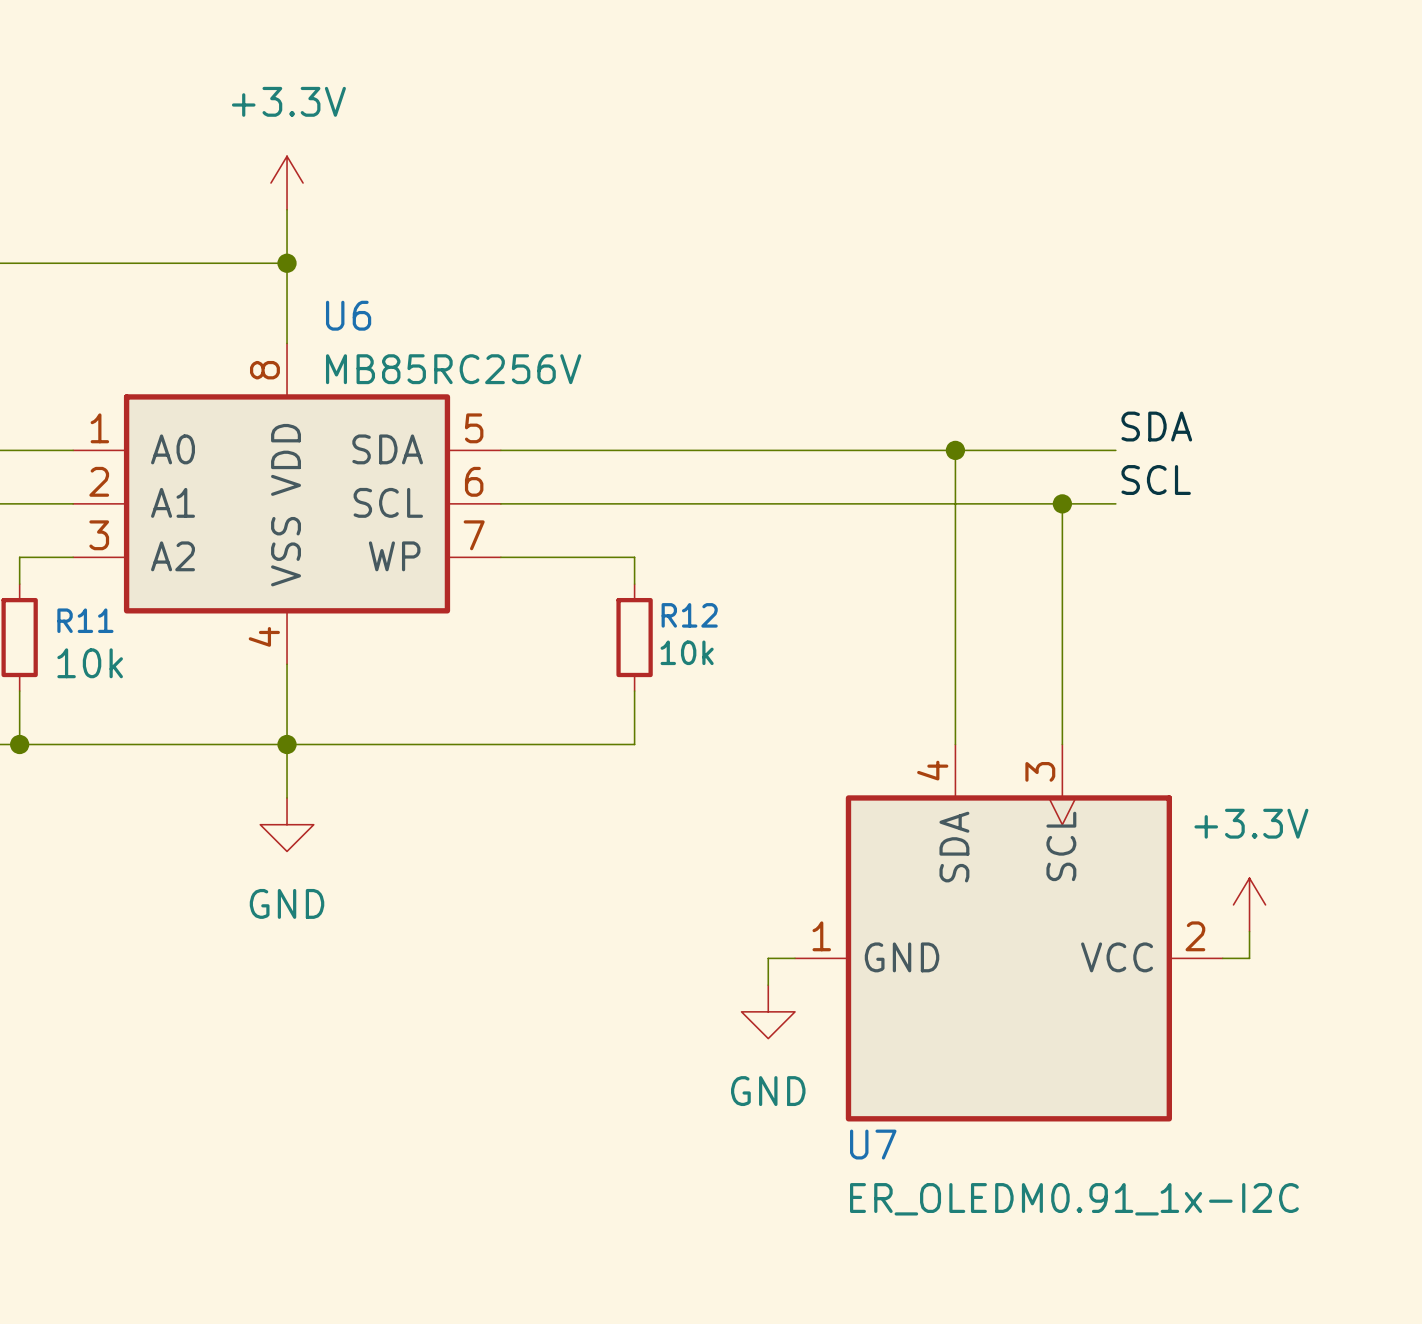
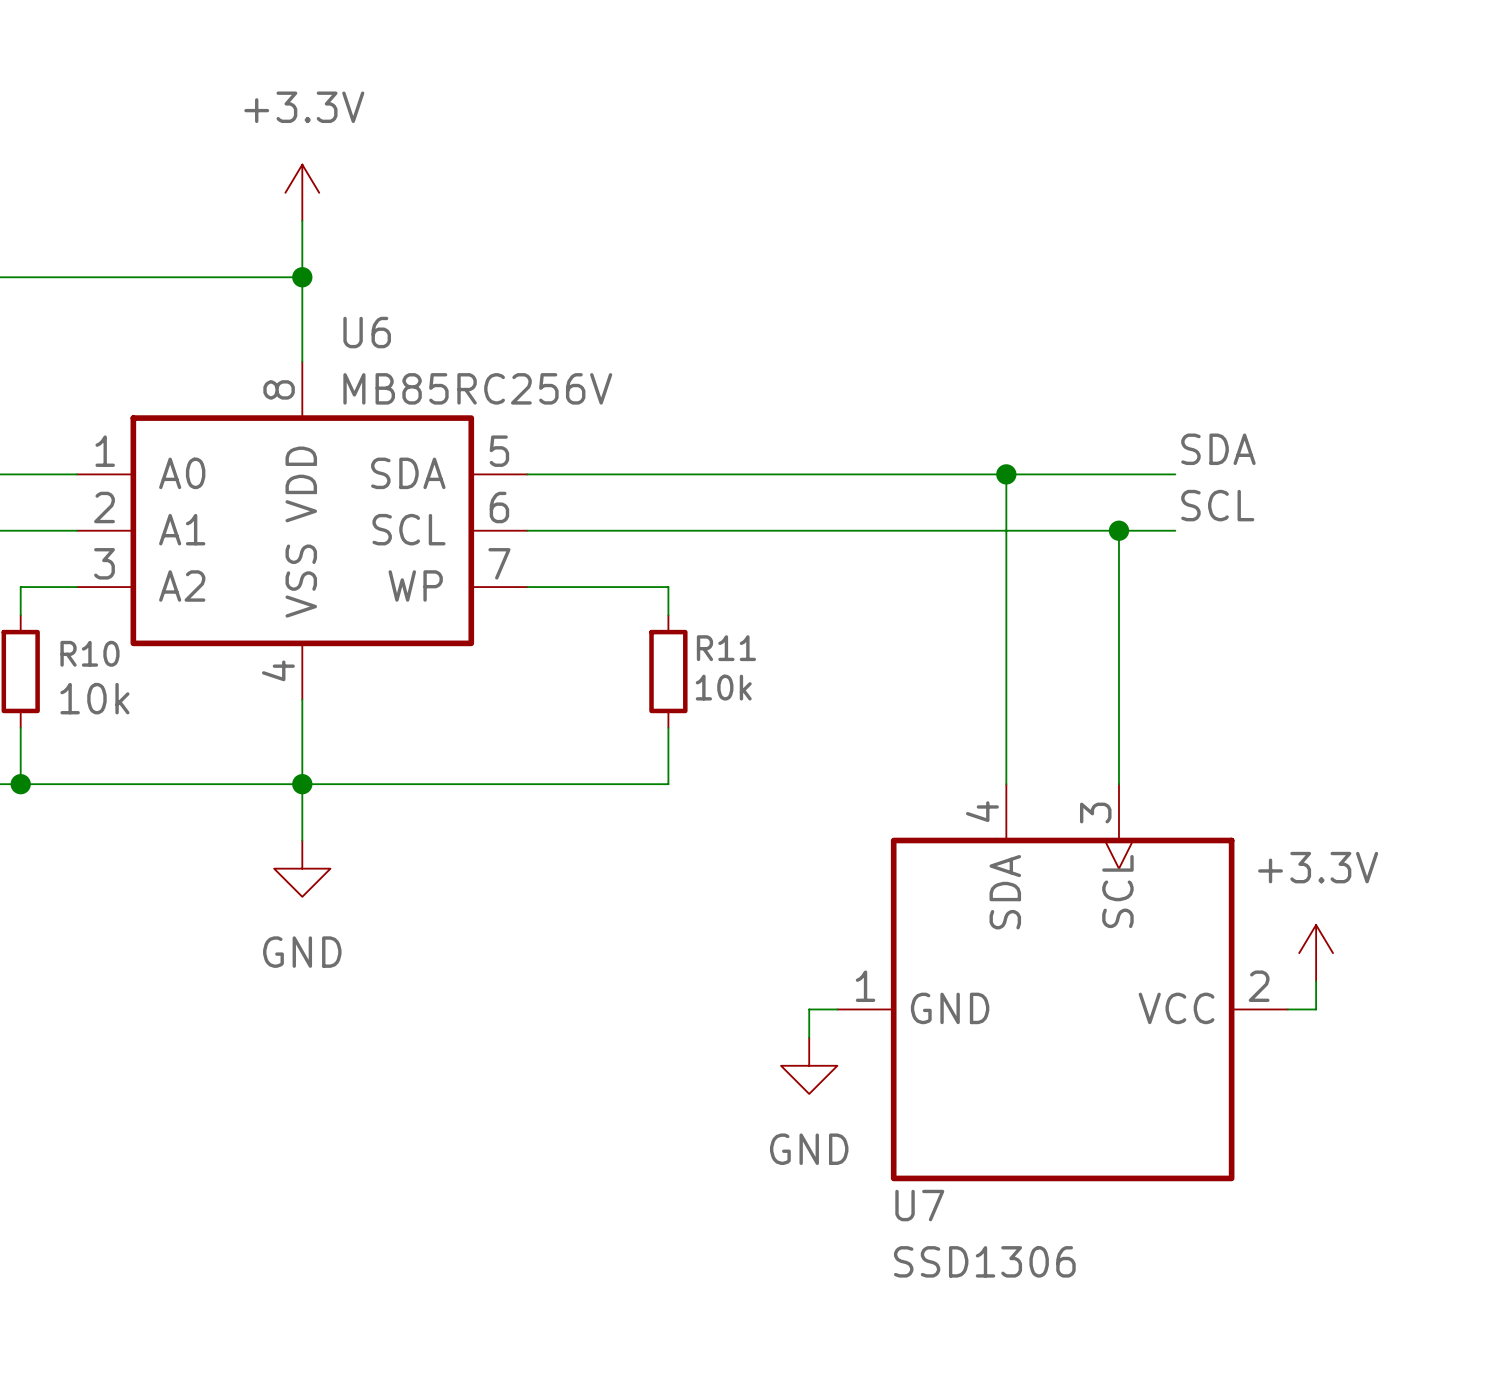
R12 name: R12 (689, 615) -> R11 (726, 648)
R11 name: R11 (85, 620) -> R10 (89, 653)
U7 value: ER_OLEDM0.91_1x-I2C (1074, 1199) -> SSD1306 (984, 1261)

